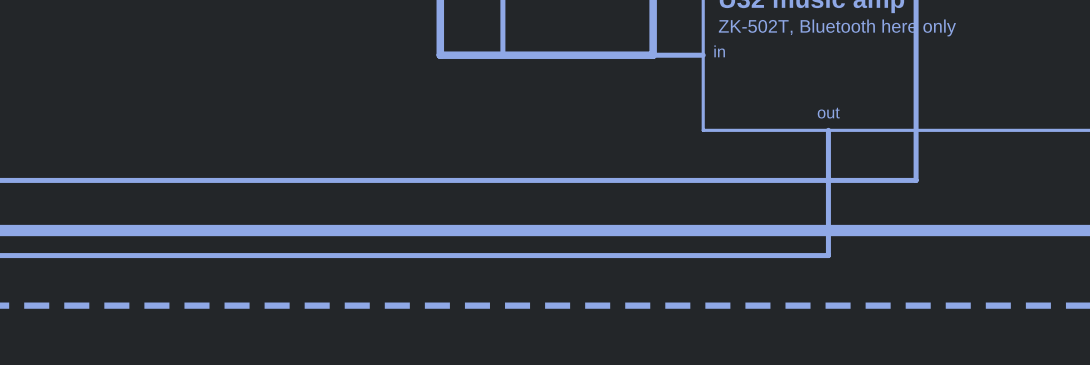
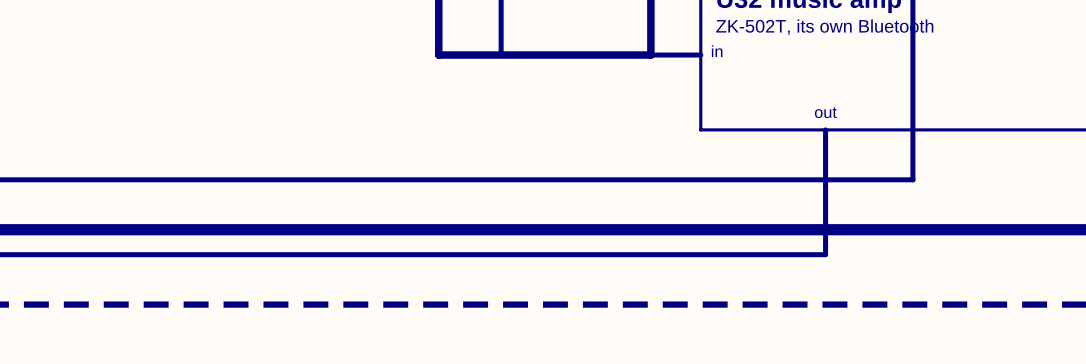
text: ZK-502T, Bluetooth here only (837, 27) -> ZK-502T, its own Bluetooth (824, 27)

